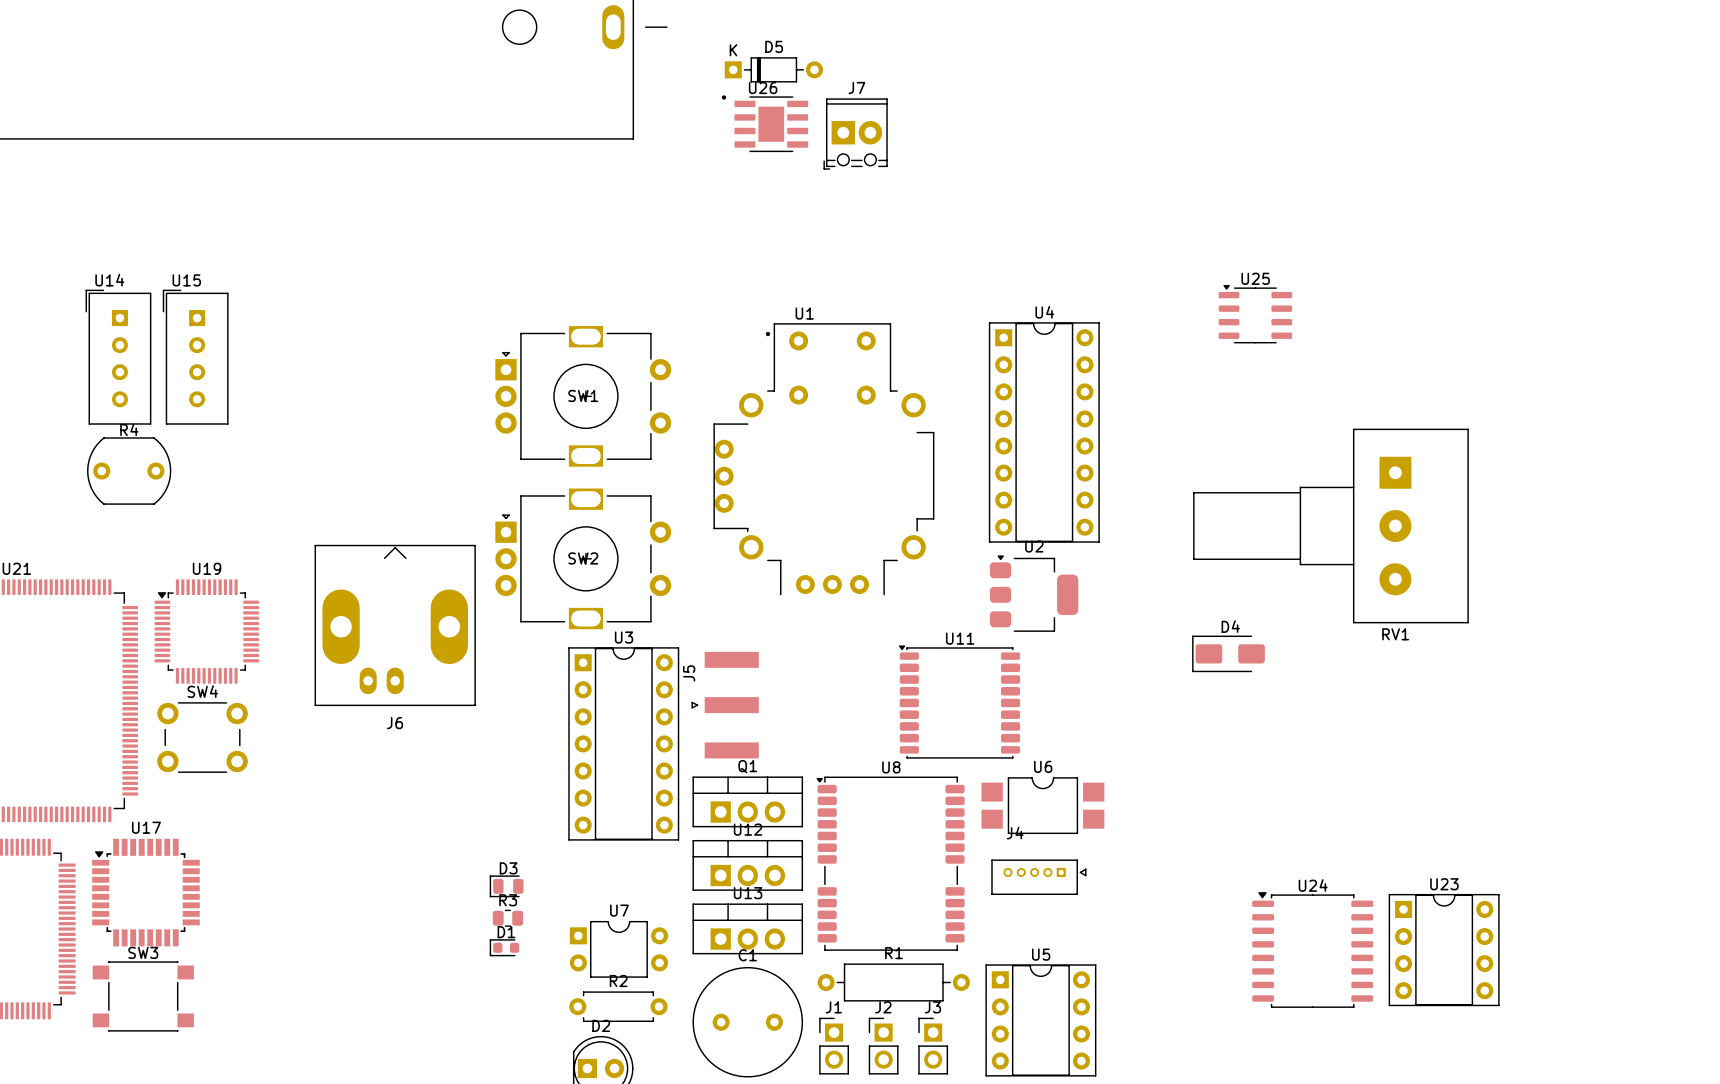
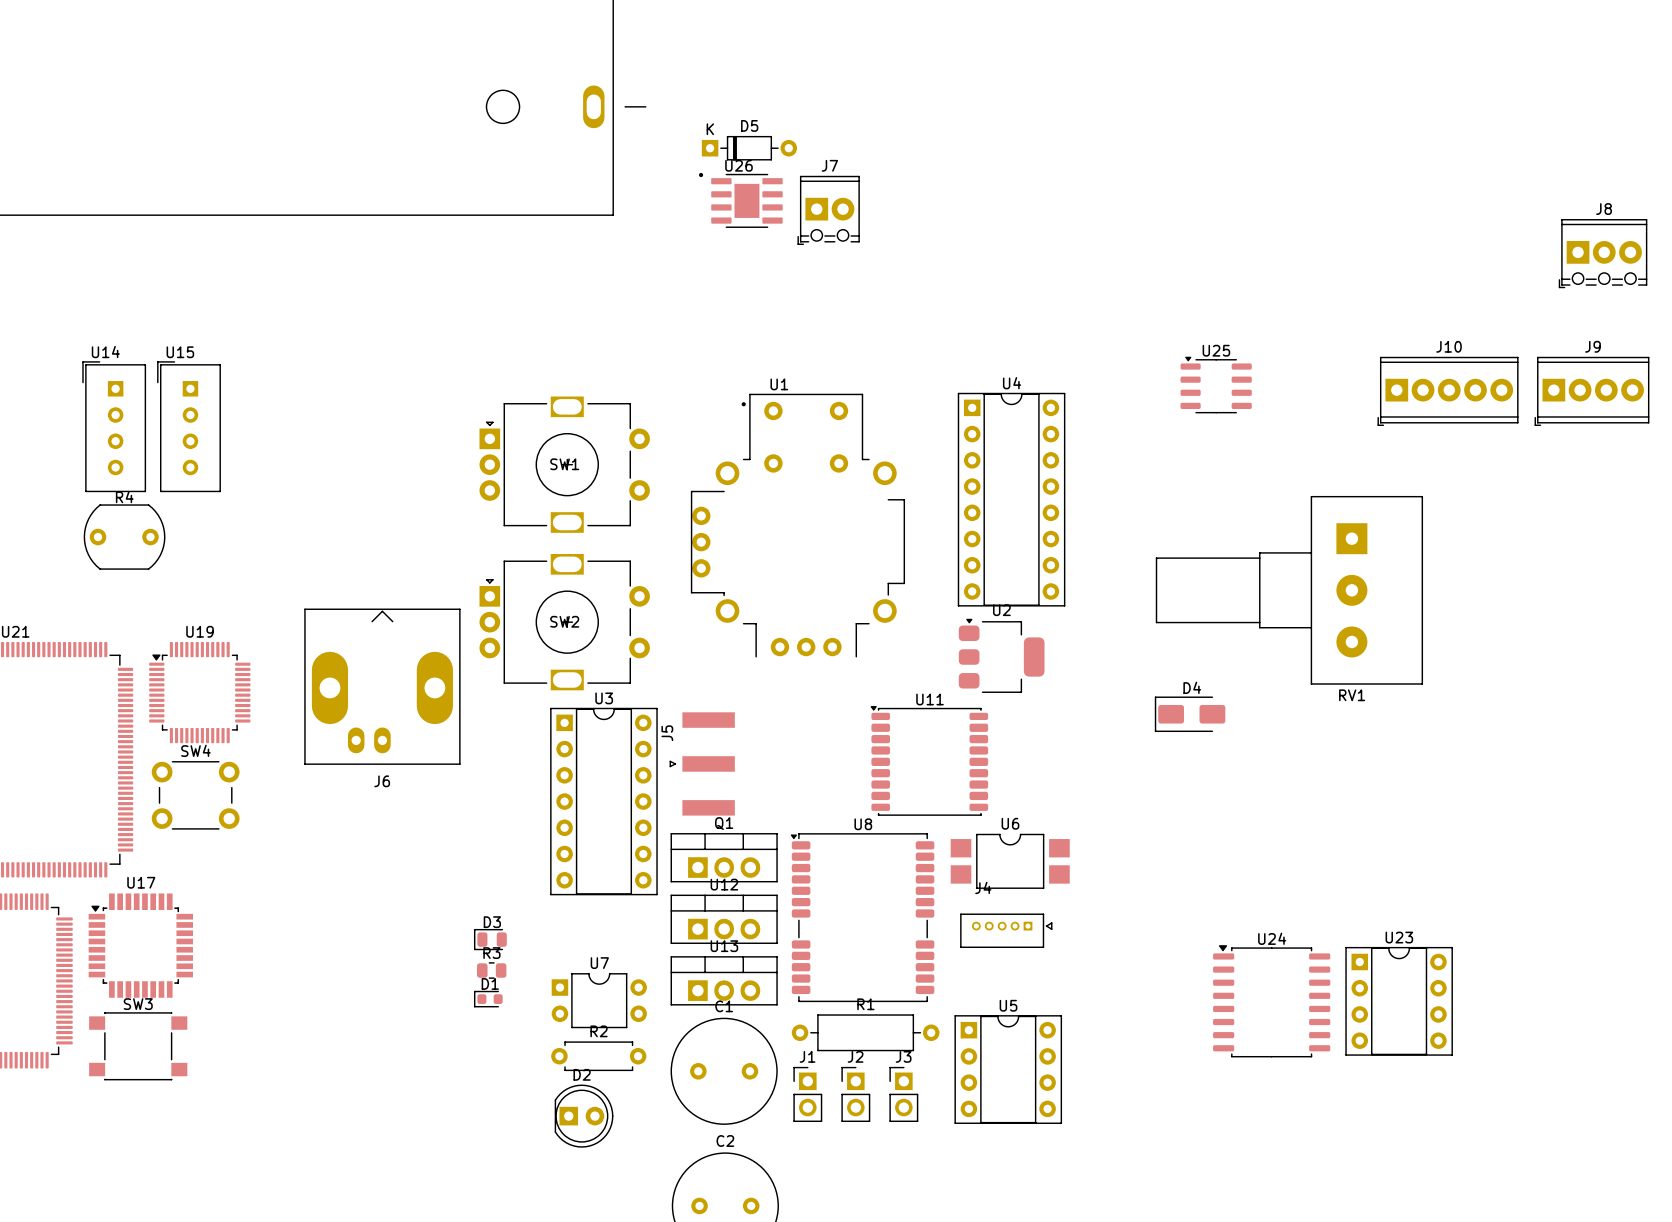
J8: none -> (1603, 253)
J10: none -> (1448, 391)
J9: none -> (1591, 391)

